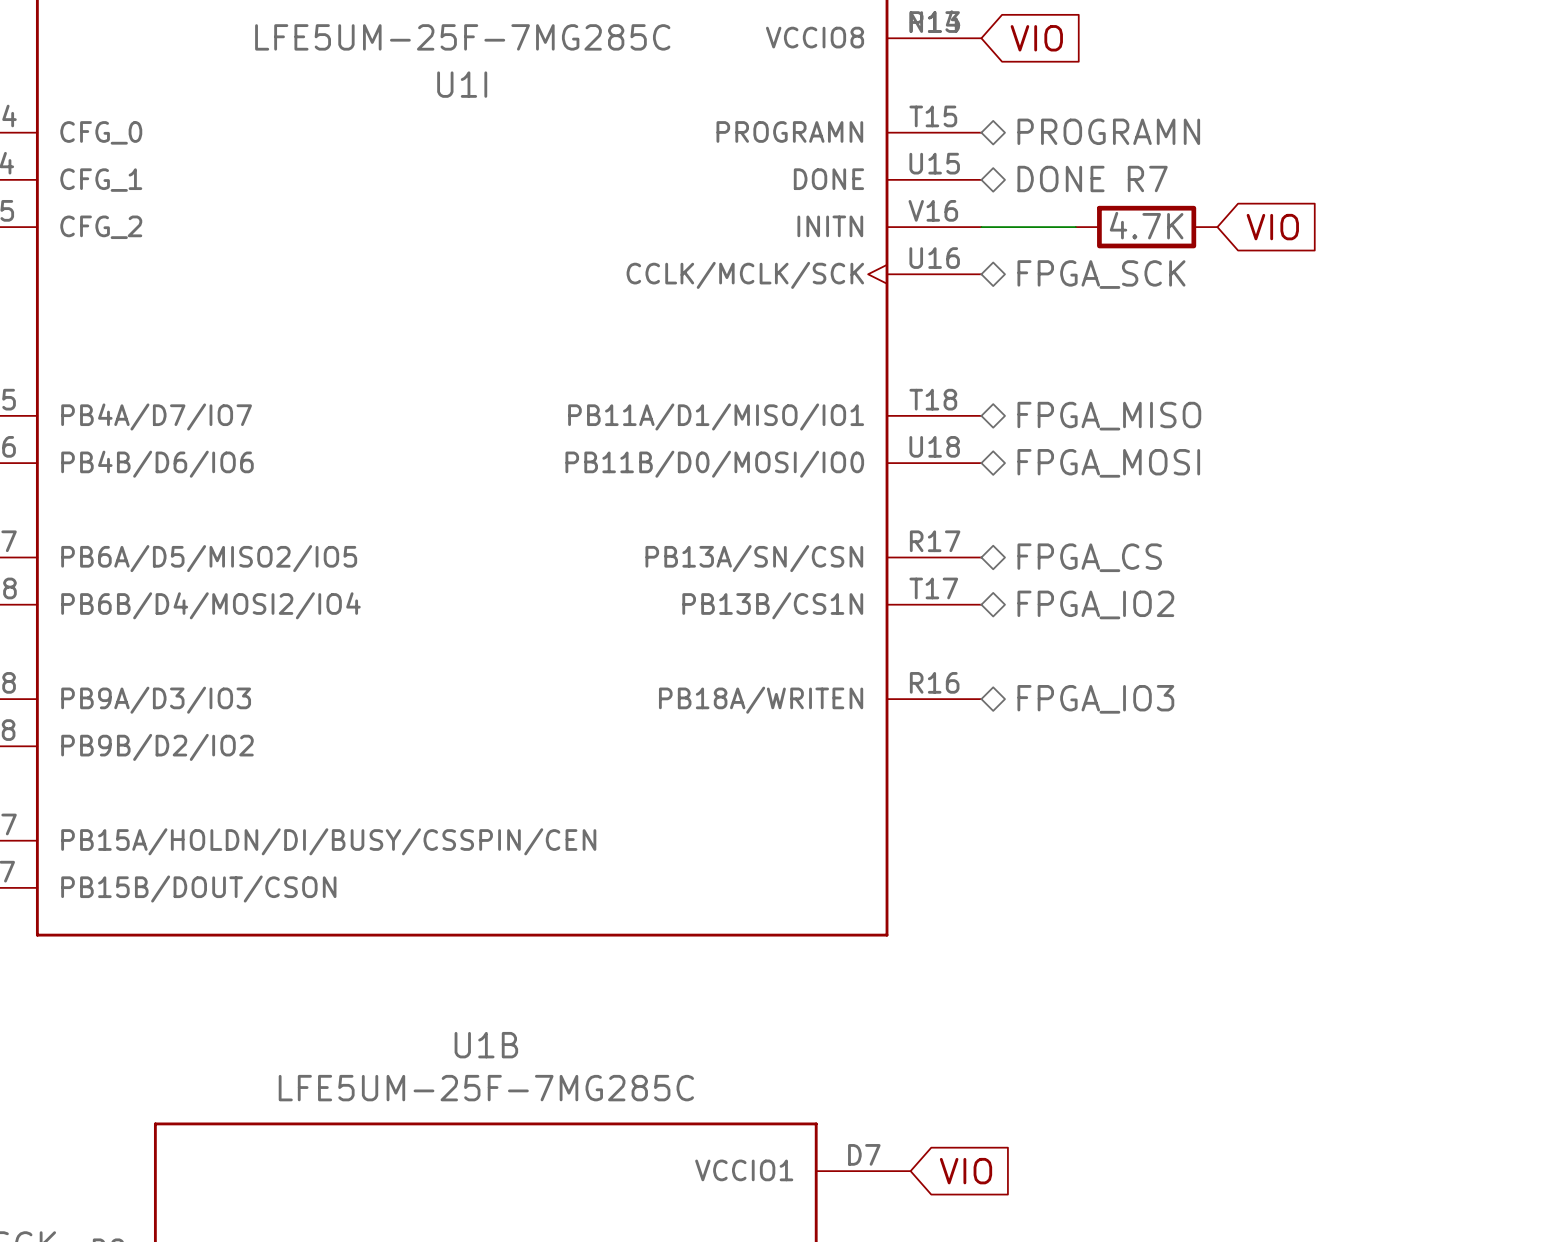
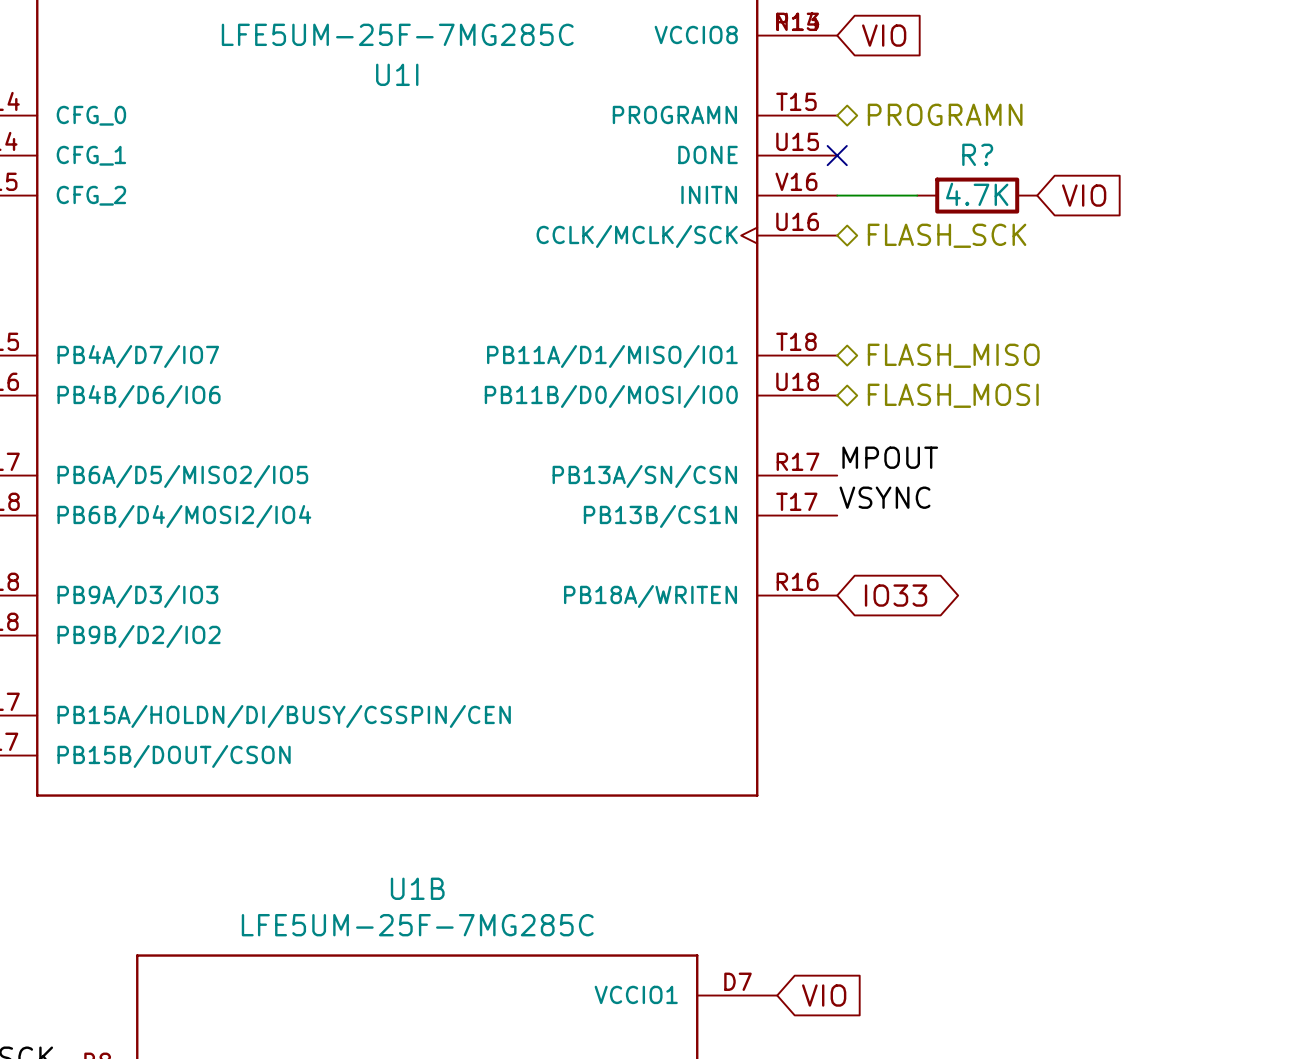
no-connect mark: none -> (837, 155)
hierarchical label: DONE (1061, 179) -> none
R7 name: R7 (1147, 179) -> R? (977, 154)
hierarchical label: FPGA_SCK (1101, 274) -> FLASH_SCK (947, 235)
hierarchical label: FPGA_MISO (1109, 416) -> FLASH_MISO (953, 355)
hierarchical label: FPGA_MOSI (1108, 463) -> FLASH_MOSI (953, 395)
label: none -> MPOUT (890, 457)
hierarchical label: FPGA_CS (1089, 557) -> none
label: none -> VSYNC (884, 497)
hierarchical label: FPGA_IO2 (1095, 604) -> none
global label: none -> IO33 (896, 595)
hierarchical label: FPGA_IO3 (1095, 699) -> none

